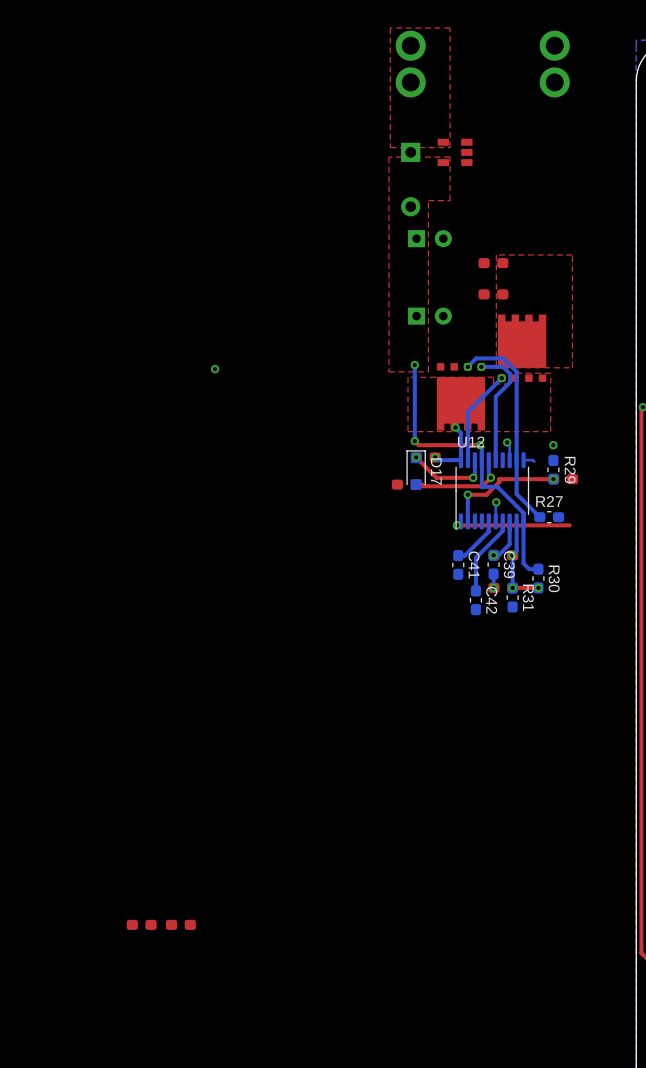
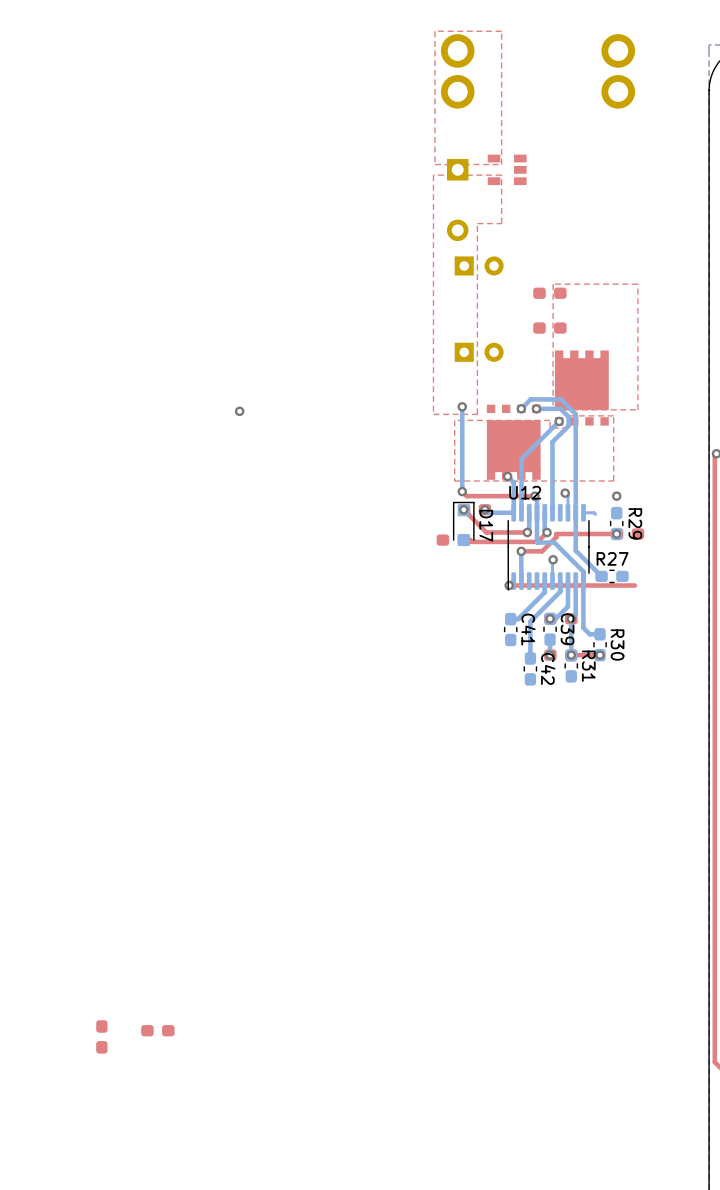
part rotation: 0° (180, 924) -> 90° clockwise (101, 1036)
part position: (180, 924) -> (101, 1036)

